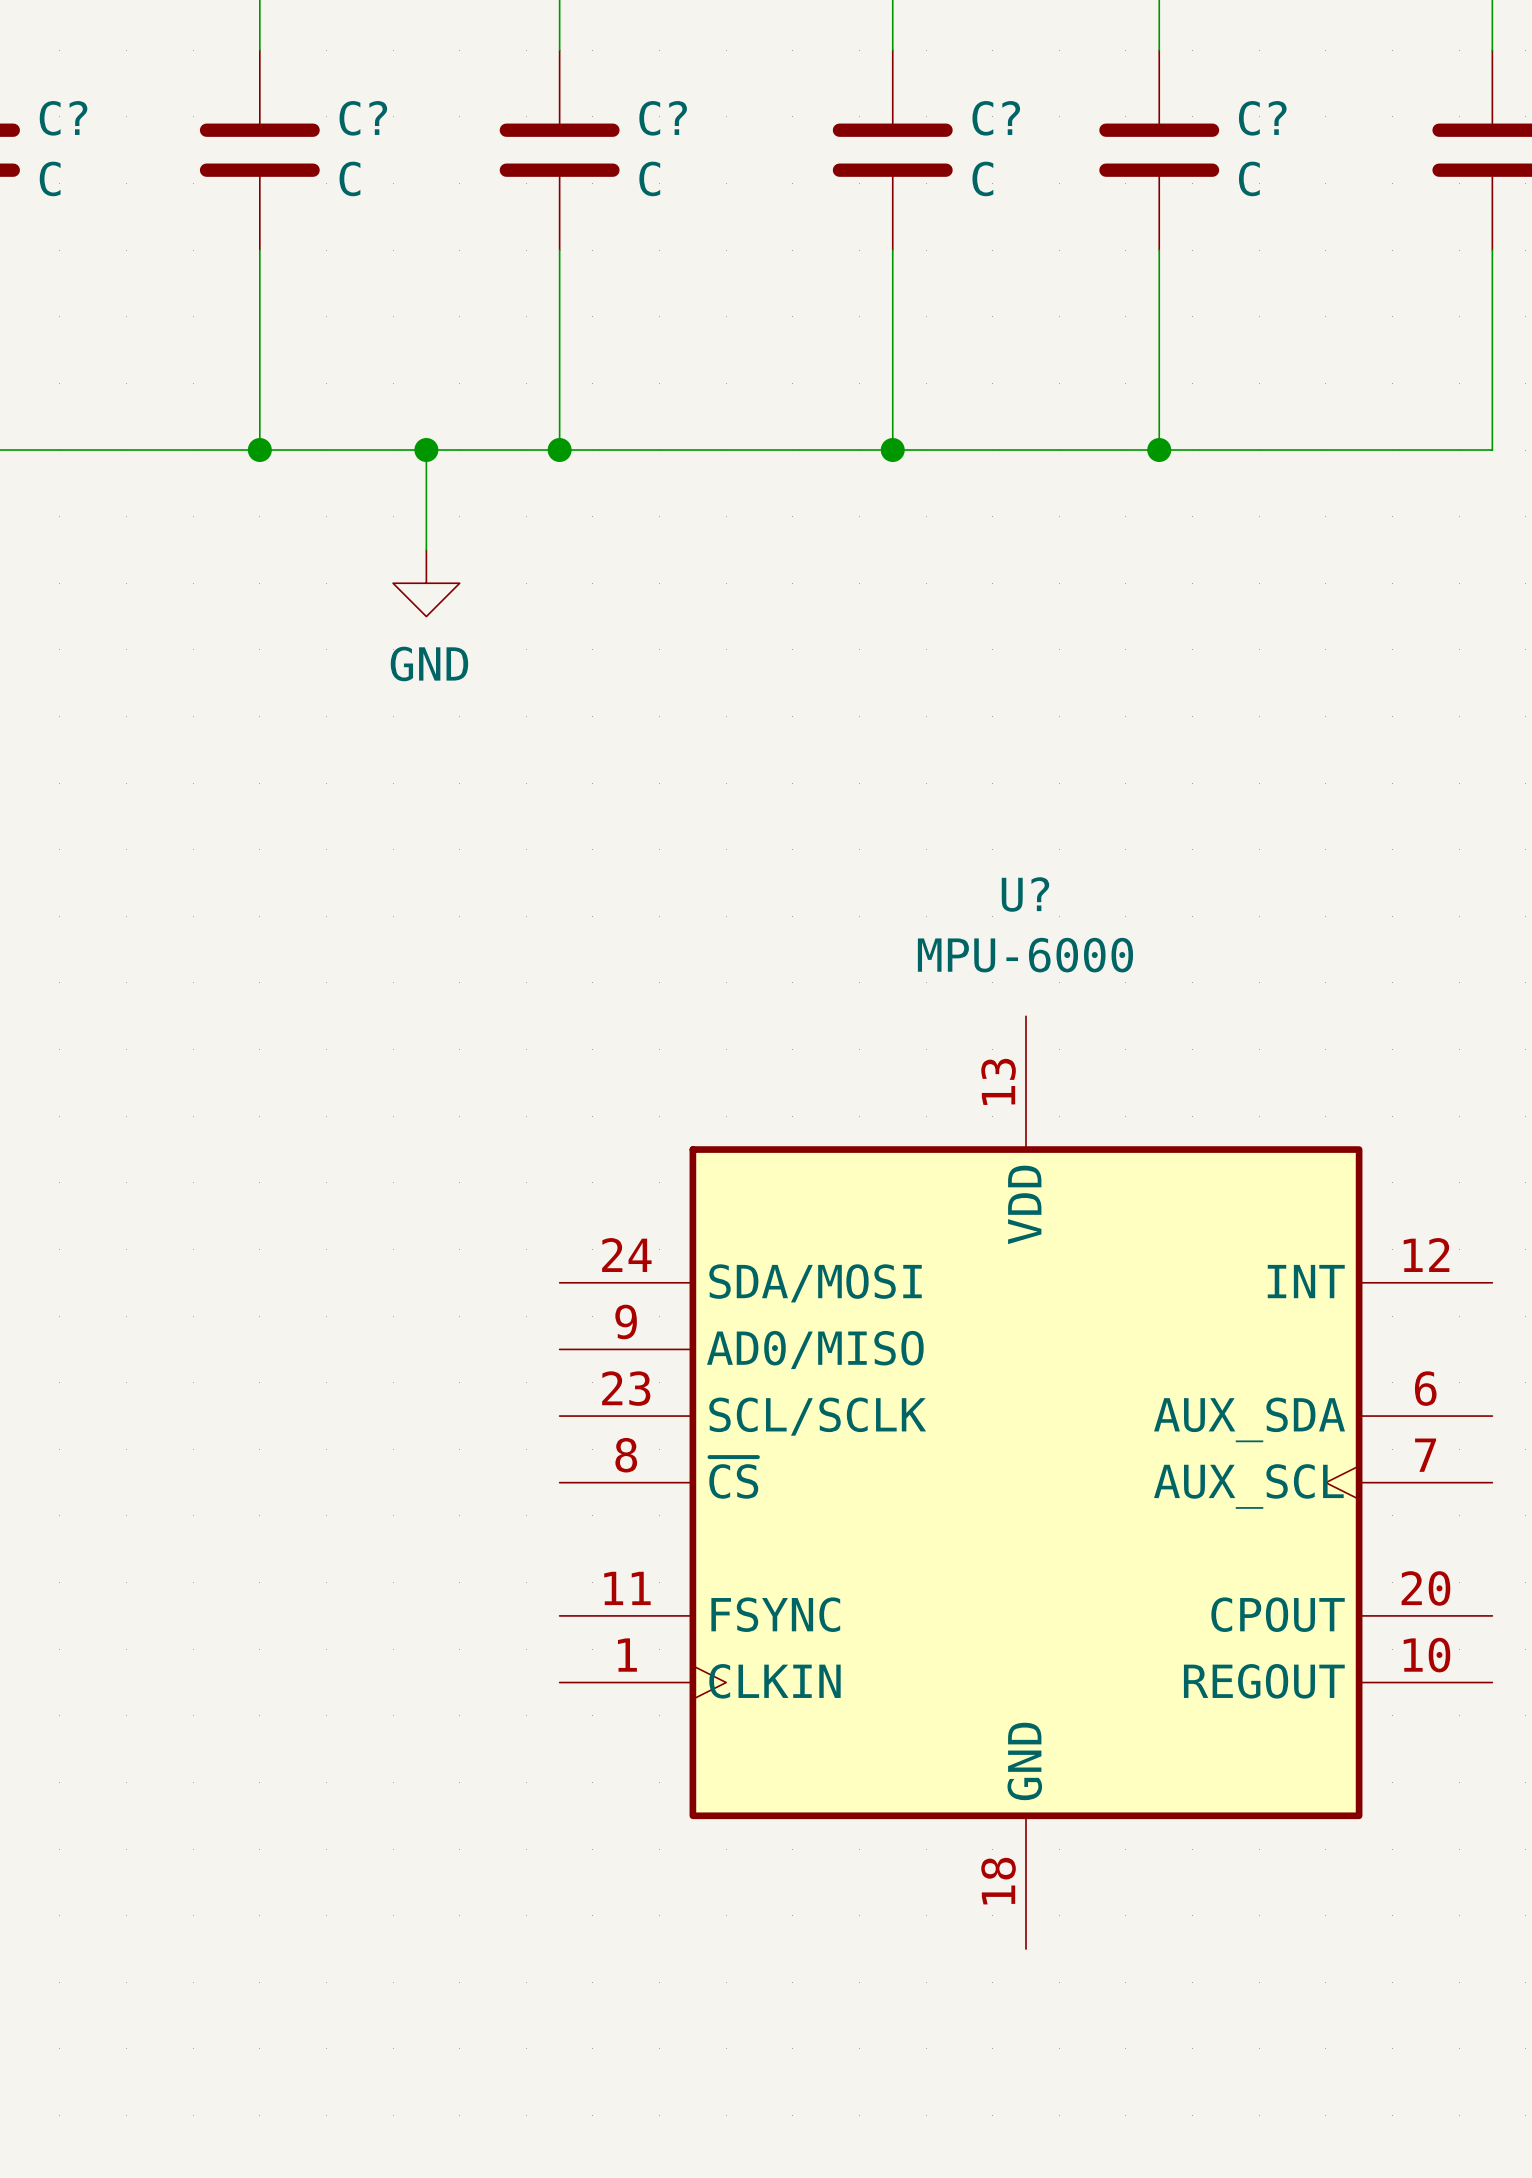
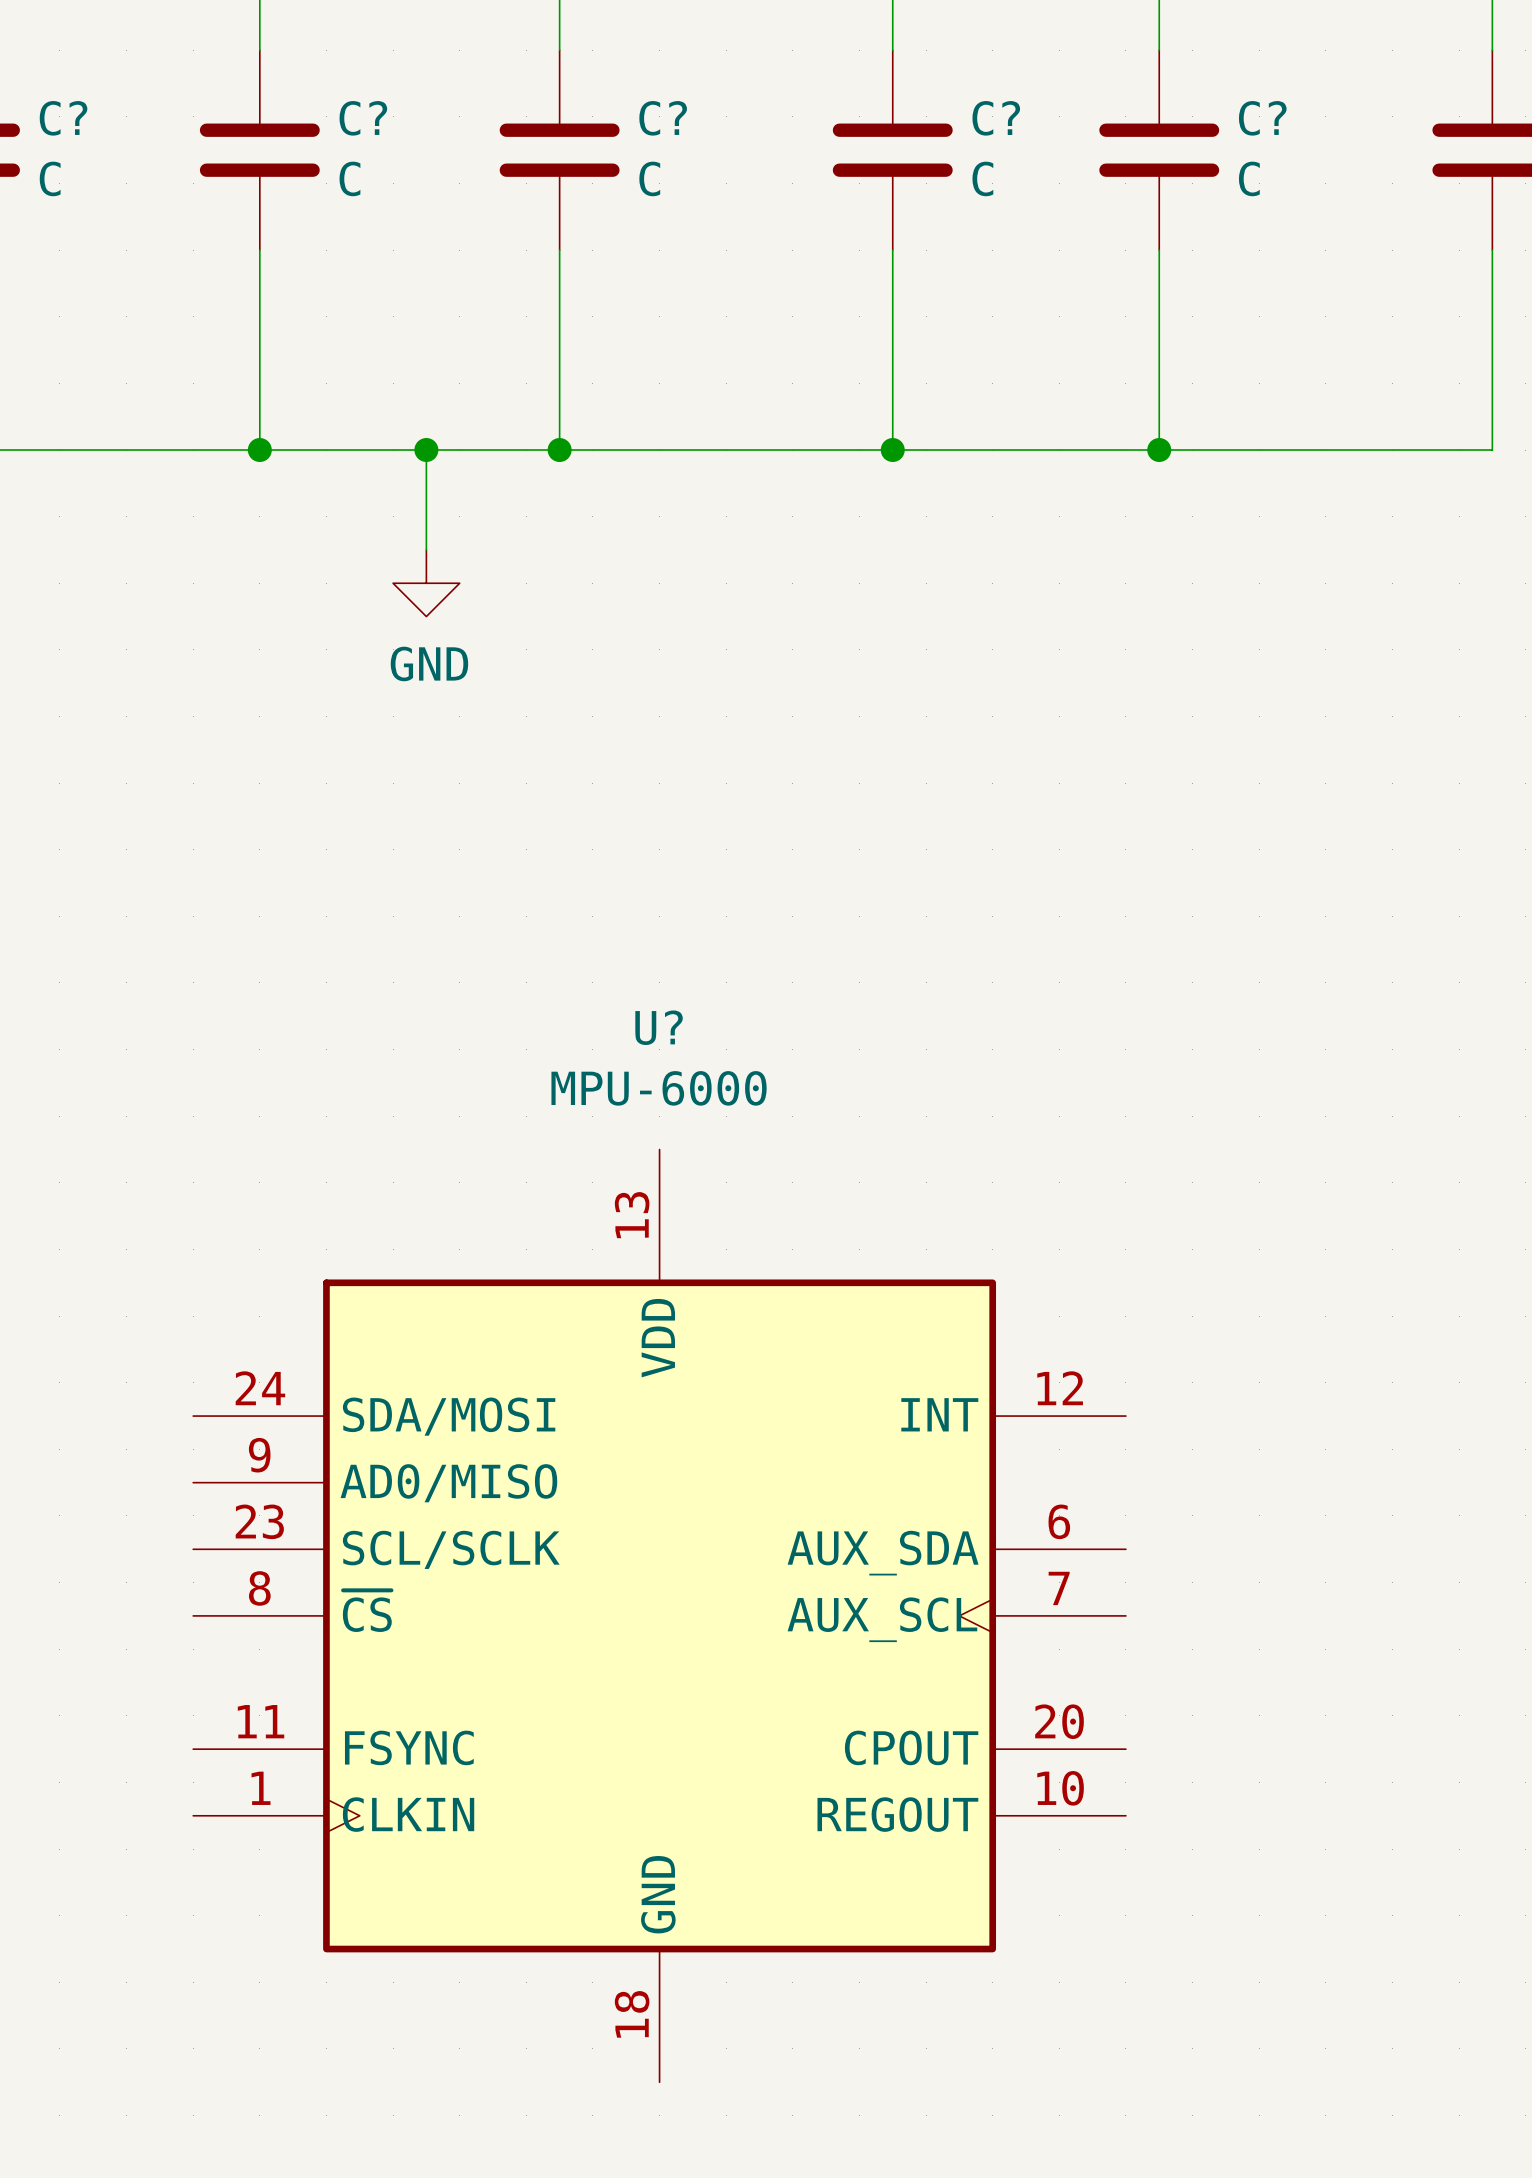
U? position: (1025, 1482) -> (659, 1615)

